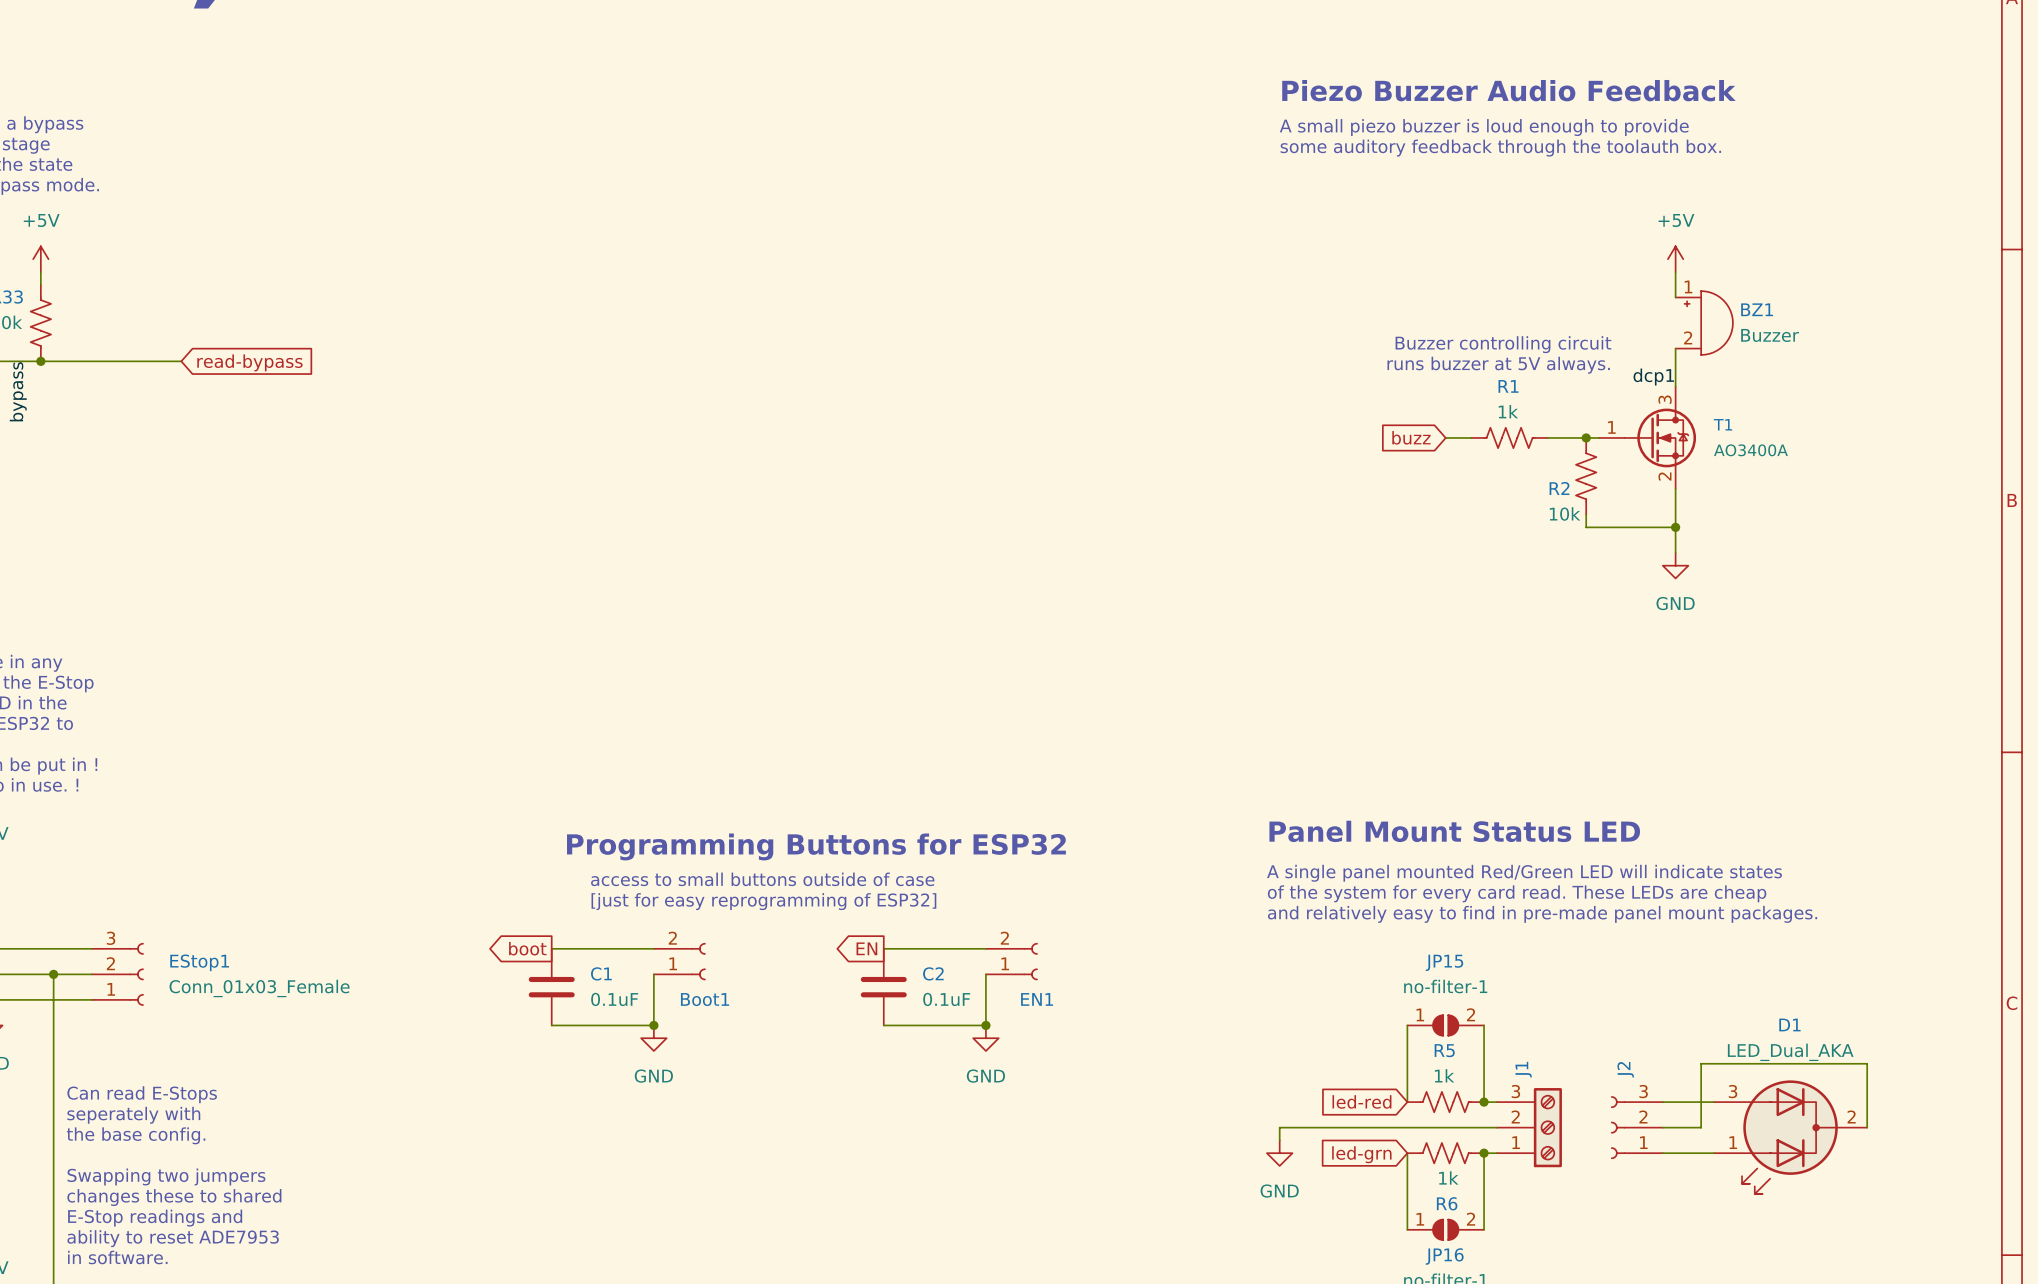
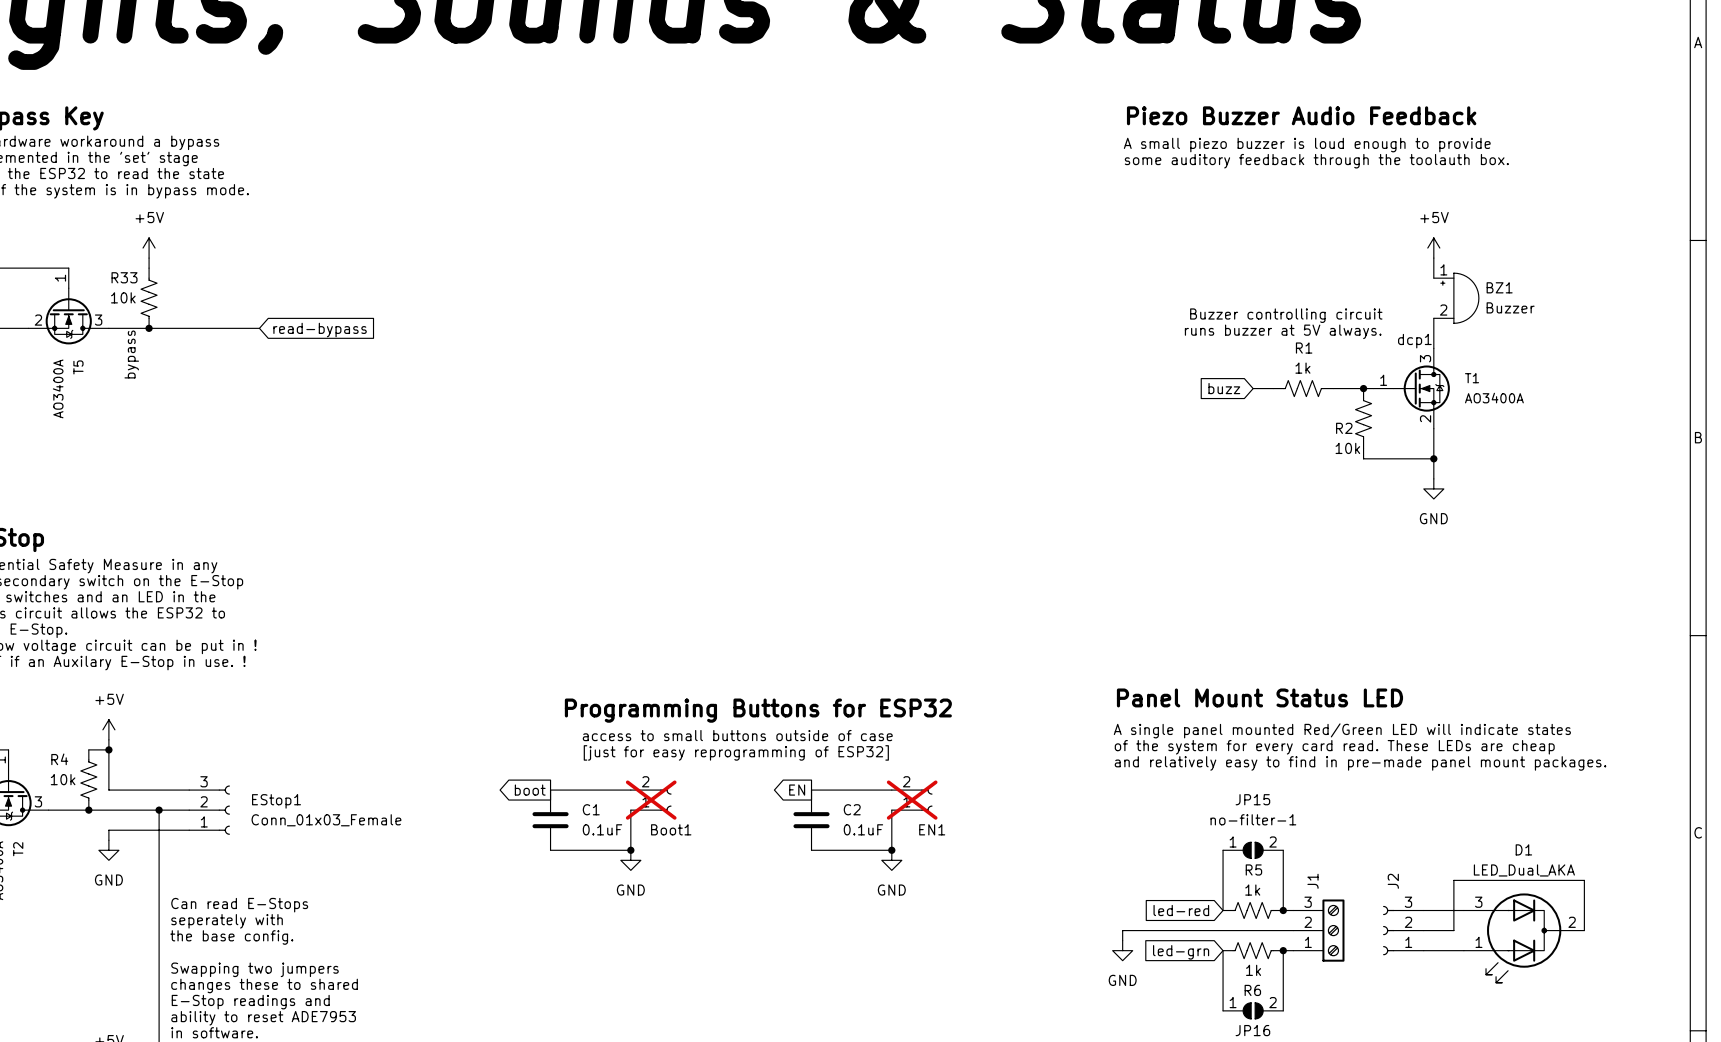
Boot1 do-not-place cross: none -> (651, 800)
EN1 do-not-place cross: none -> (912, 800)

